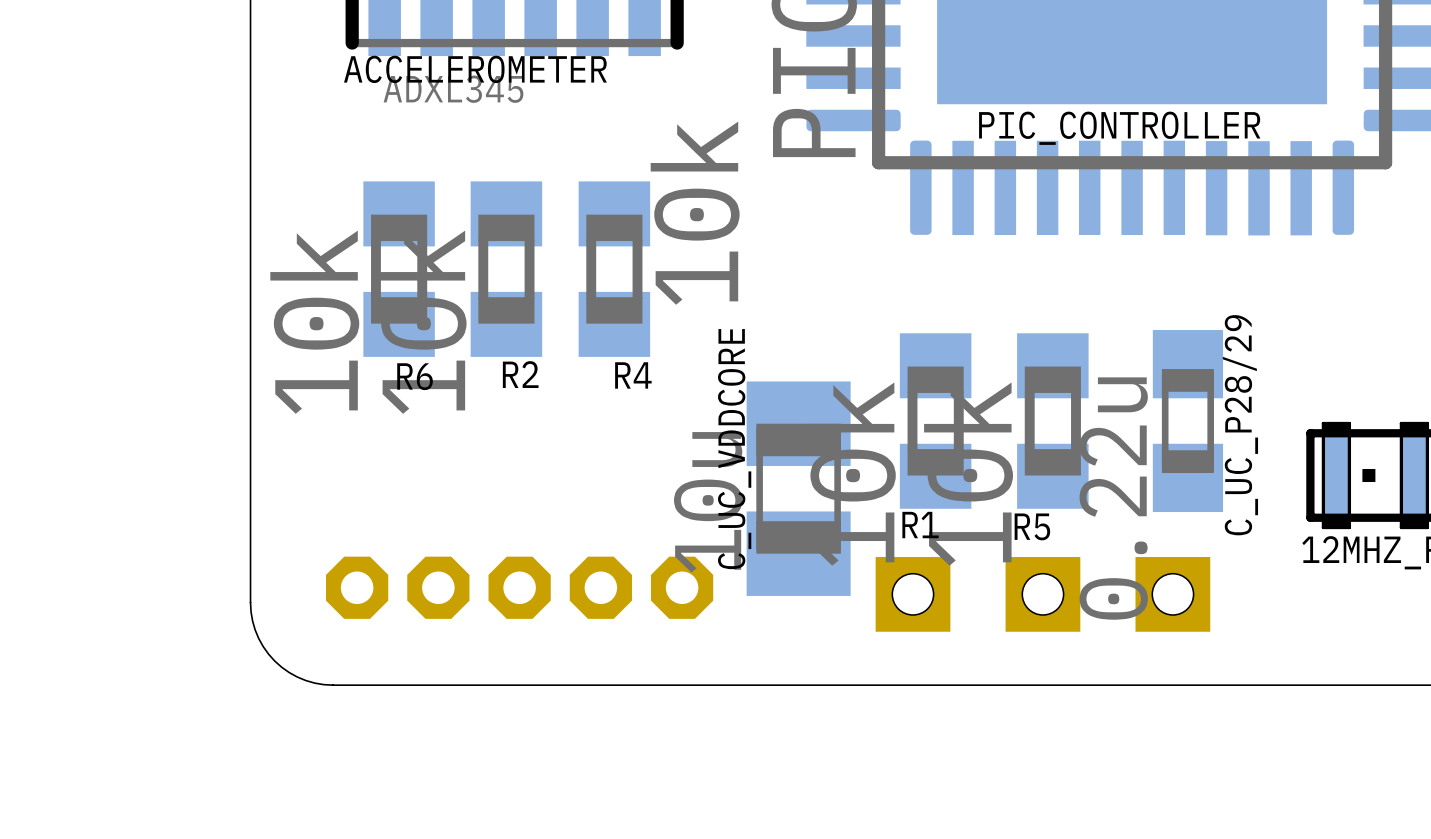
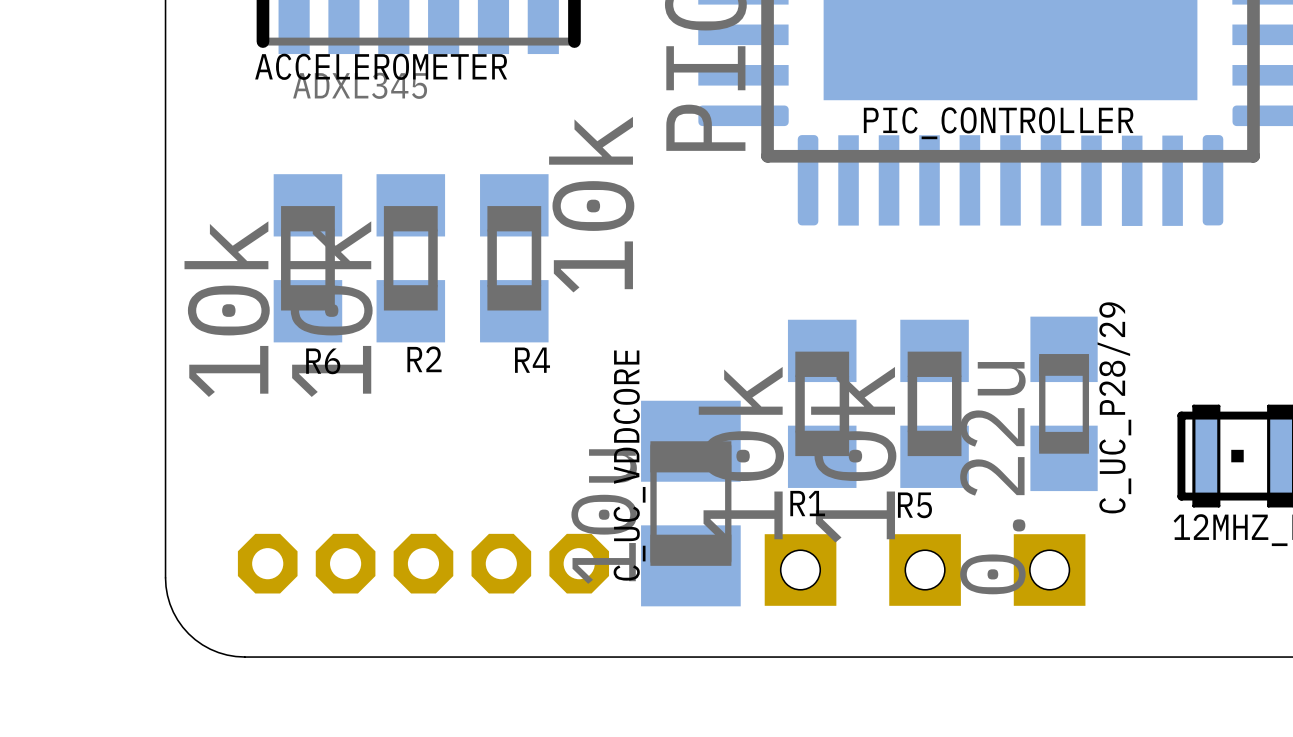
C_UC_VDDCORE position: (798, 488) -> (690, 503)

